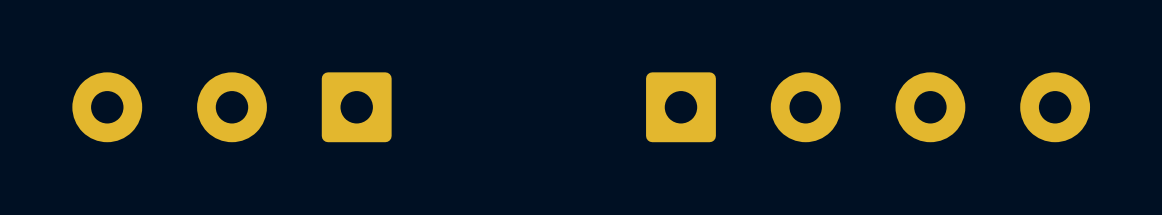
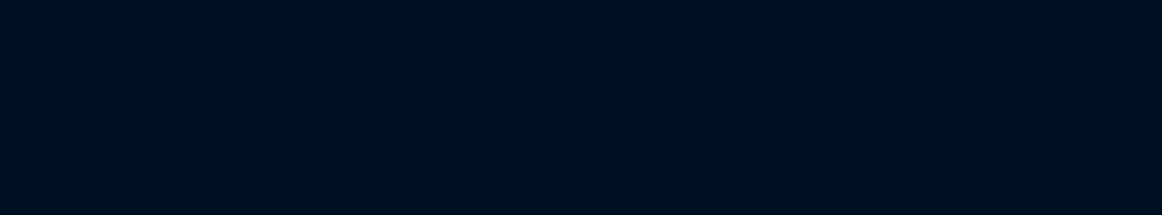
part: (231, 107) -> none
part: (868, 107) -> none

